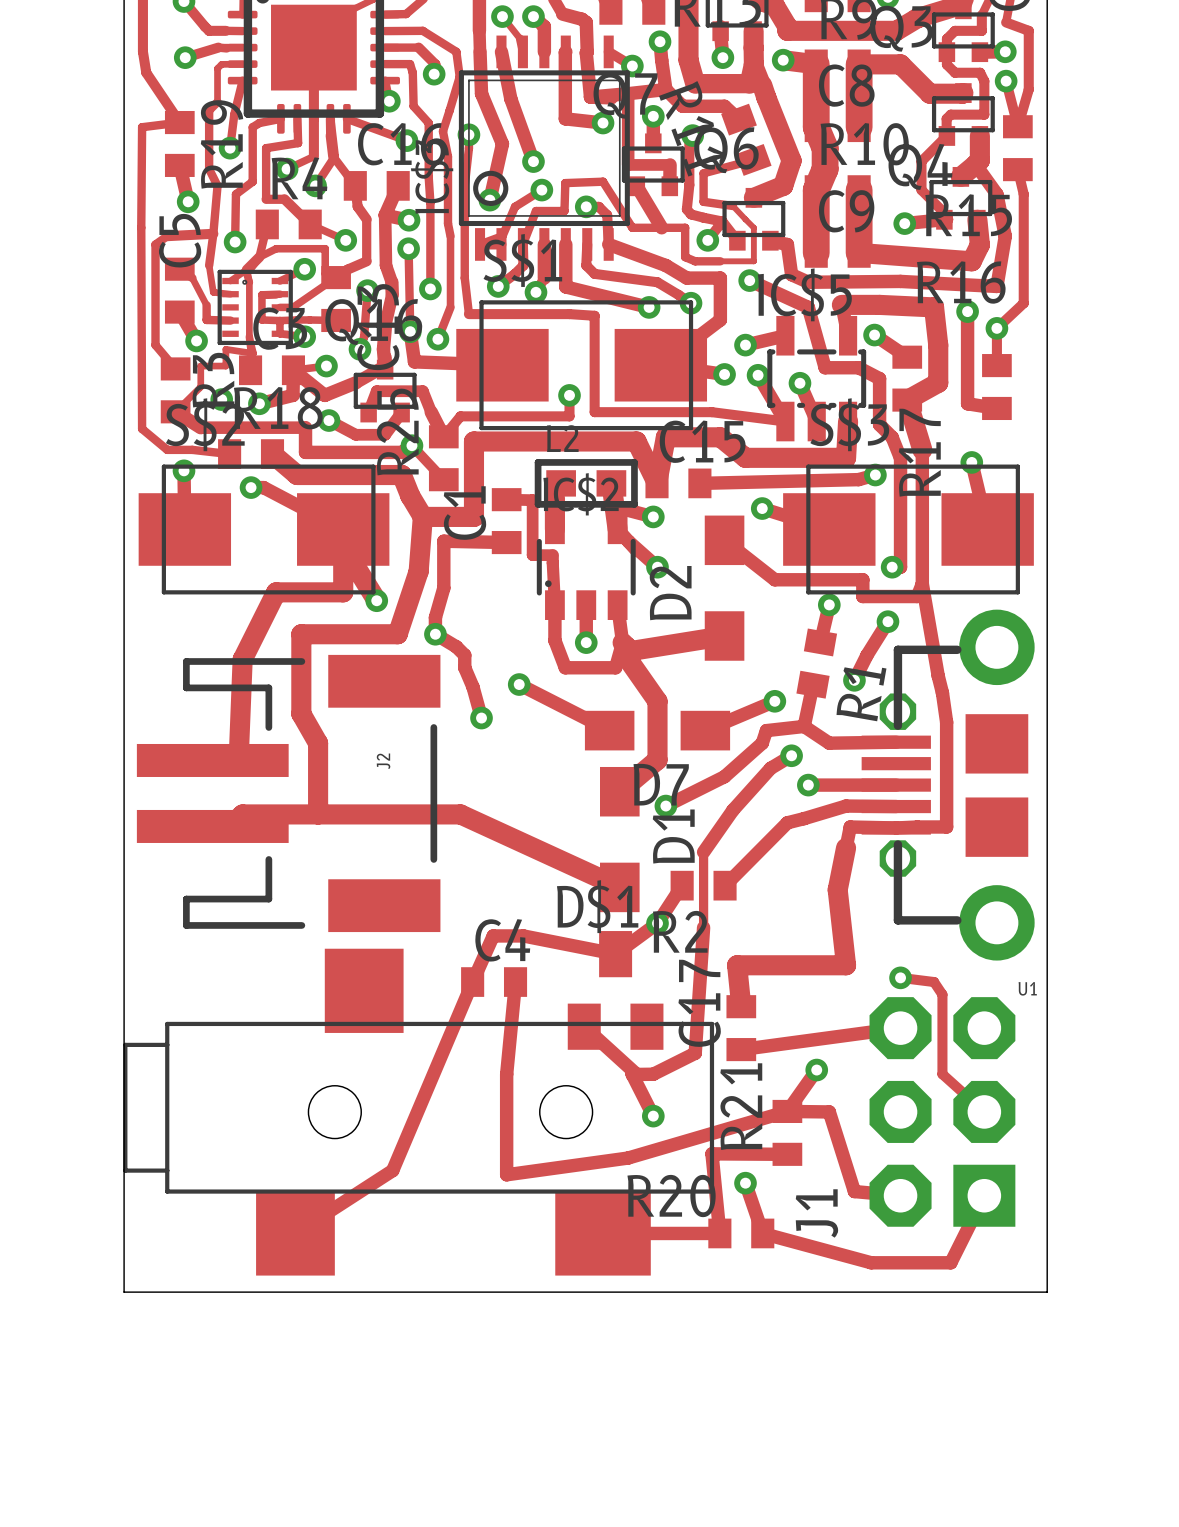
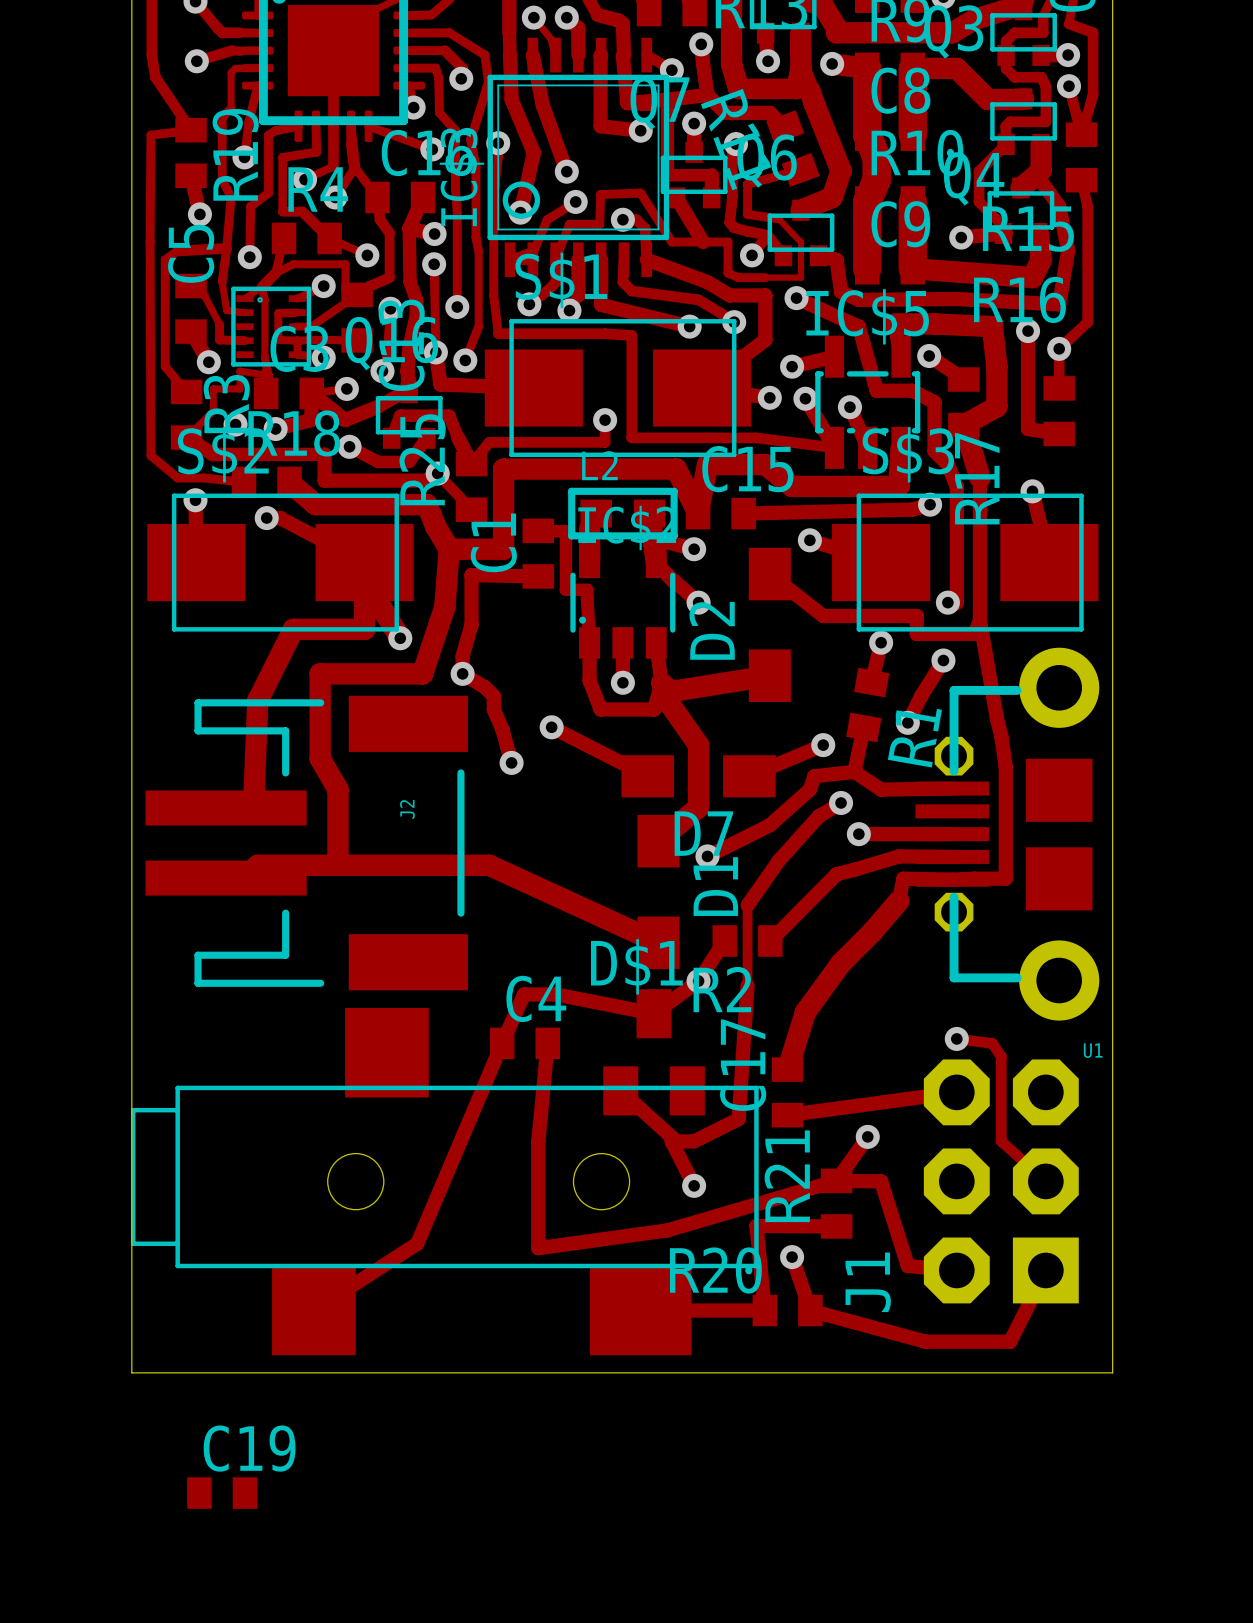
track: (846, 847) (837, 889) (846, 965) (737, 965) (741, 1006) -> (898, 900) (872, 932) (841, 963) (805, 1012) (787, 1069)
C19: none -> (222, 1493)

